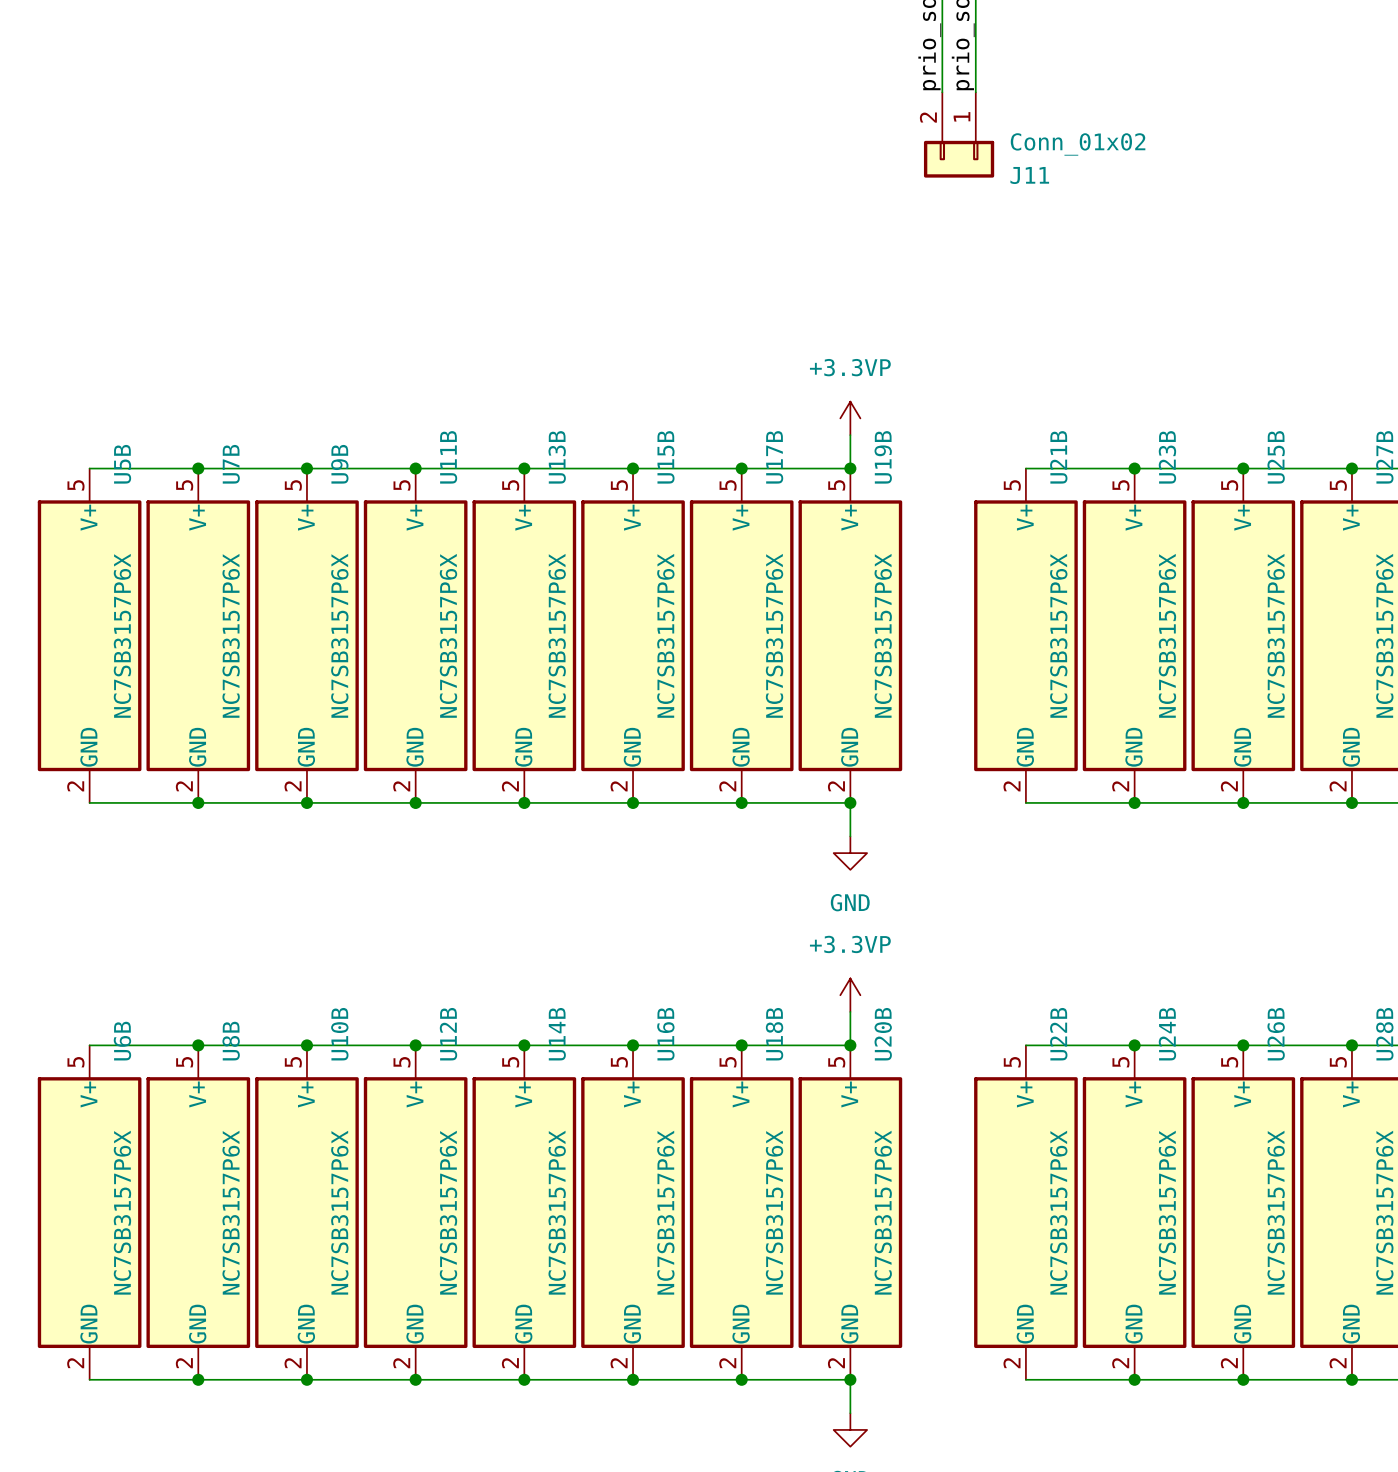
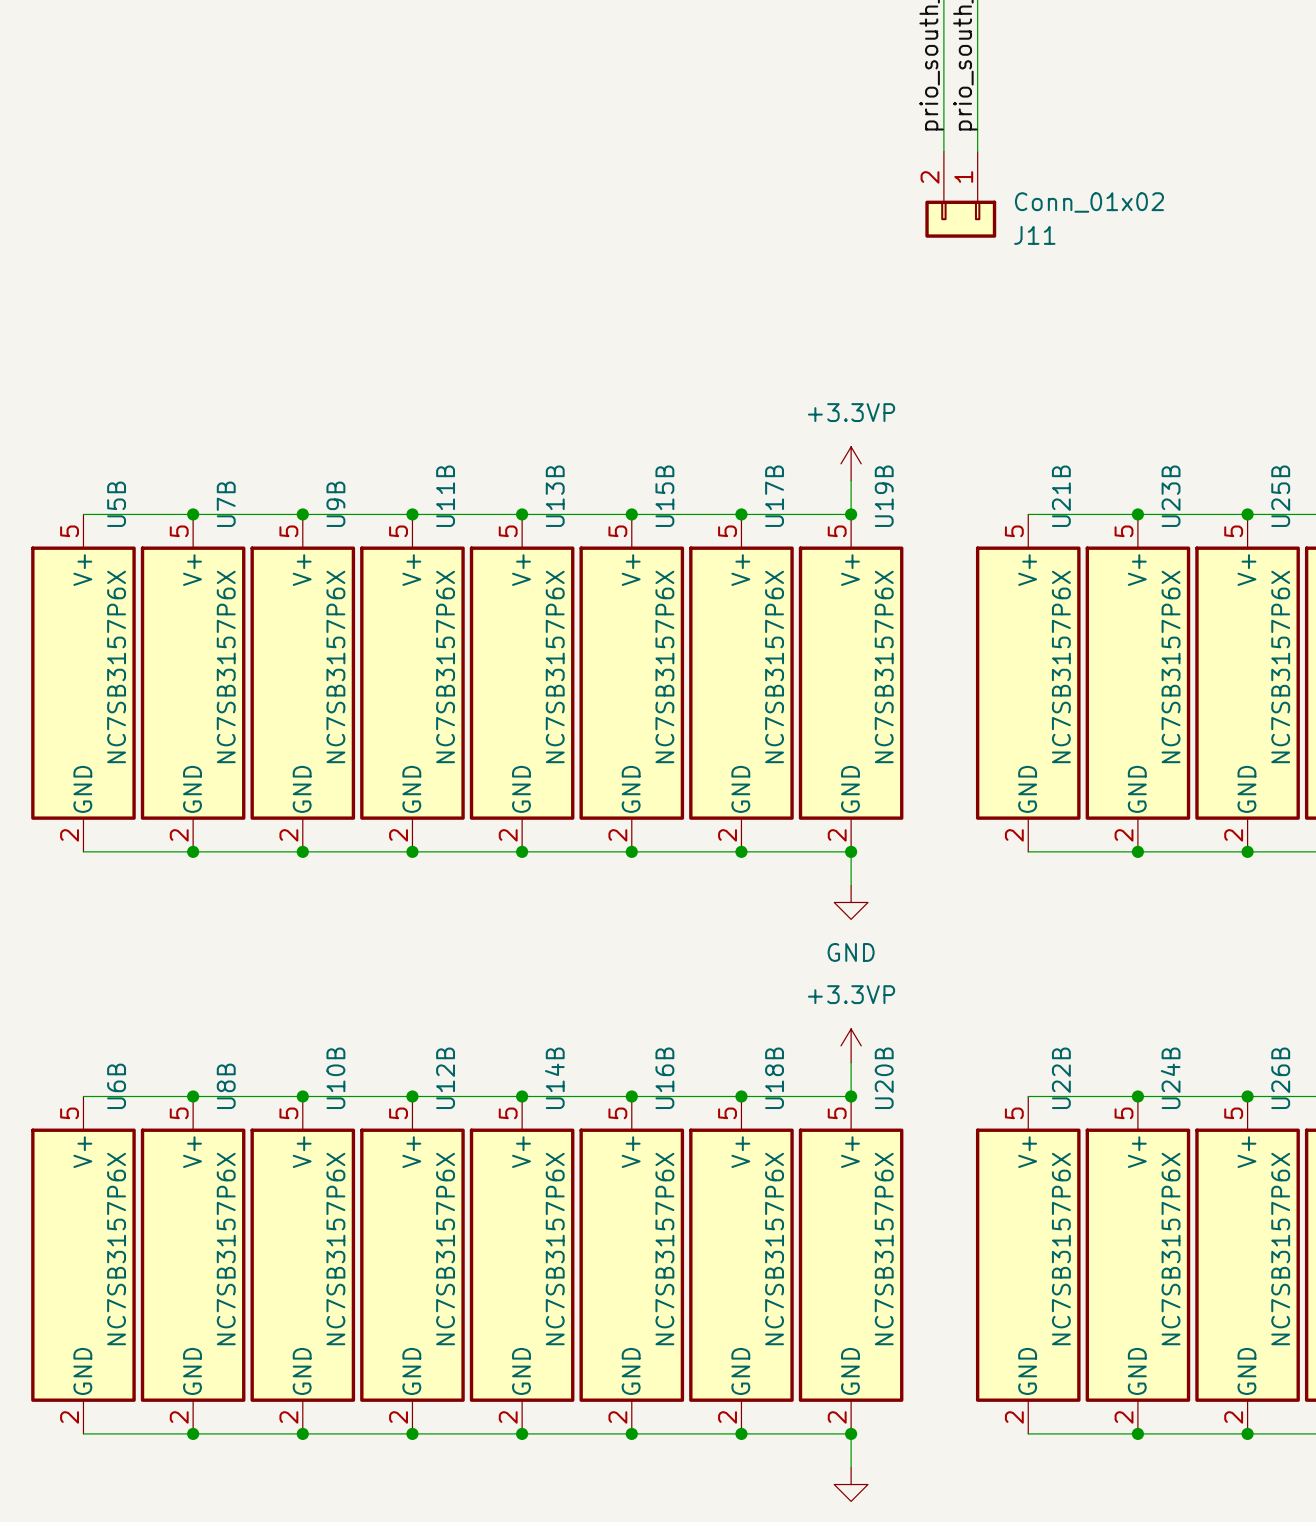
J11 position: (959, 134) -> (960, 194)

